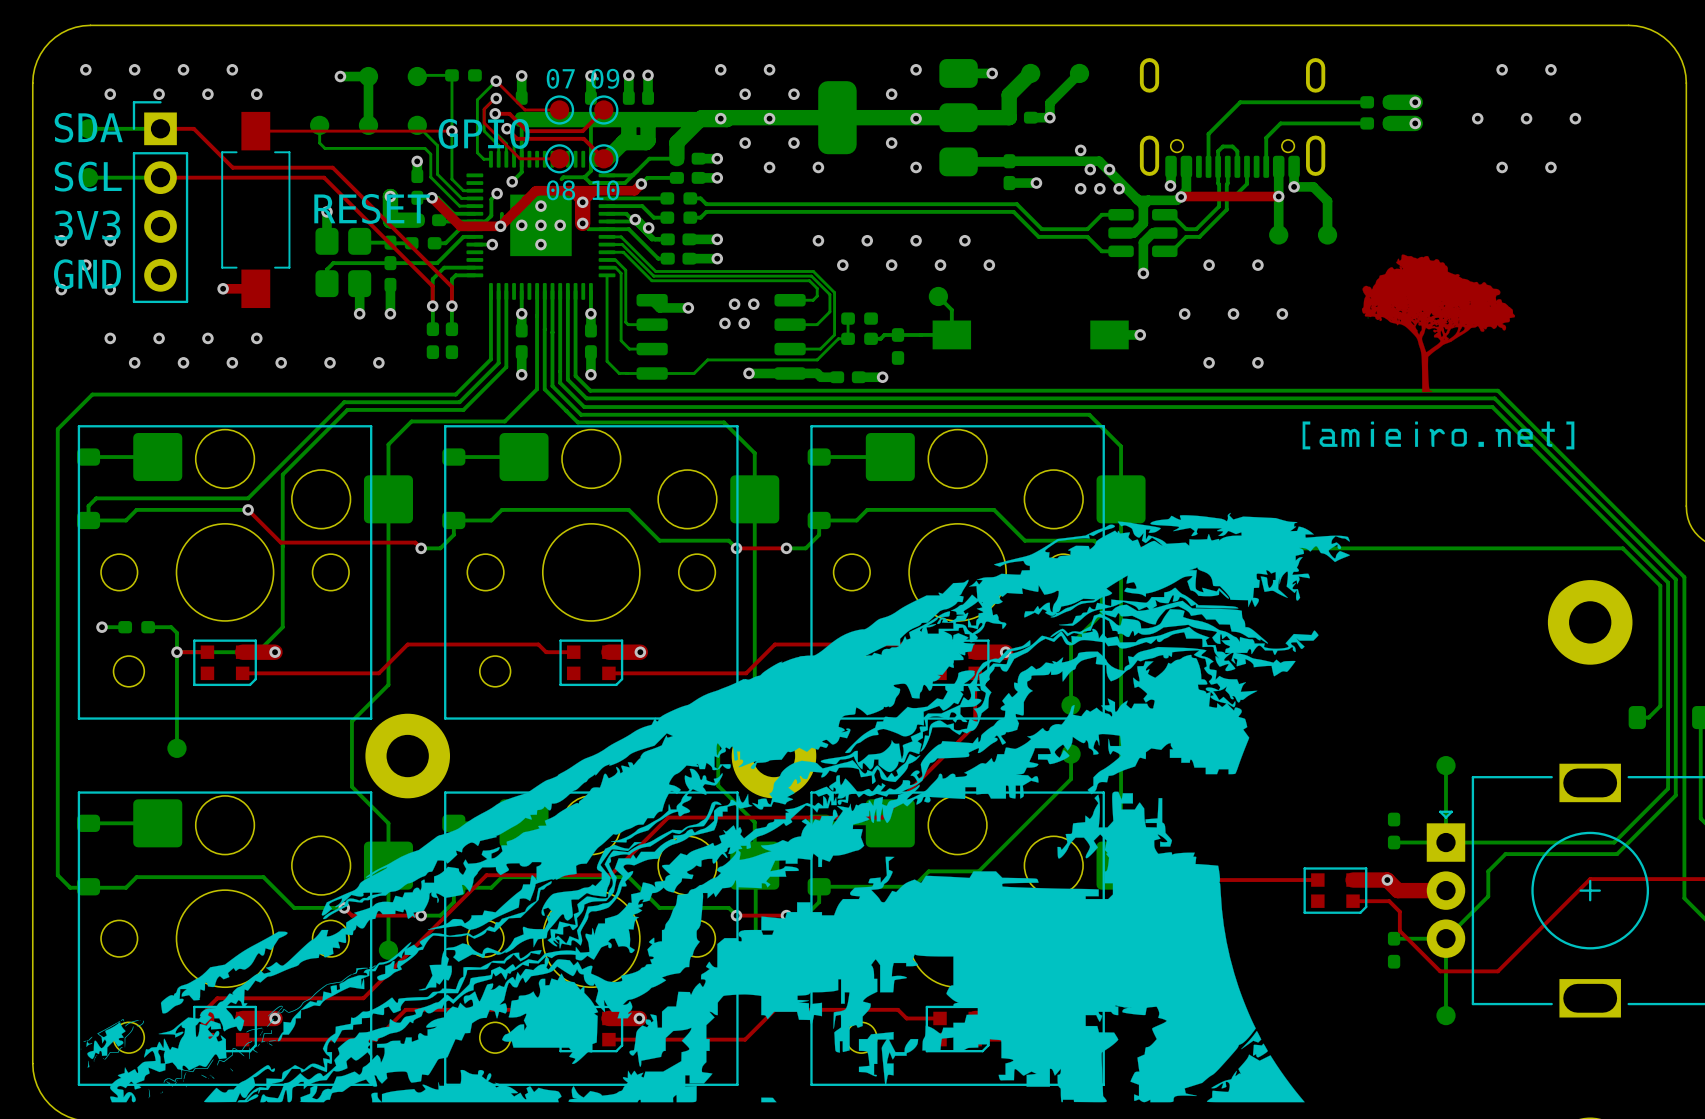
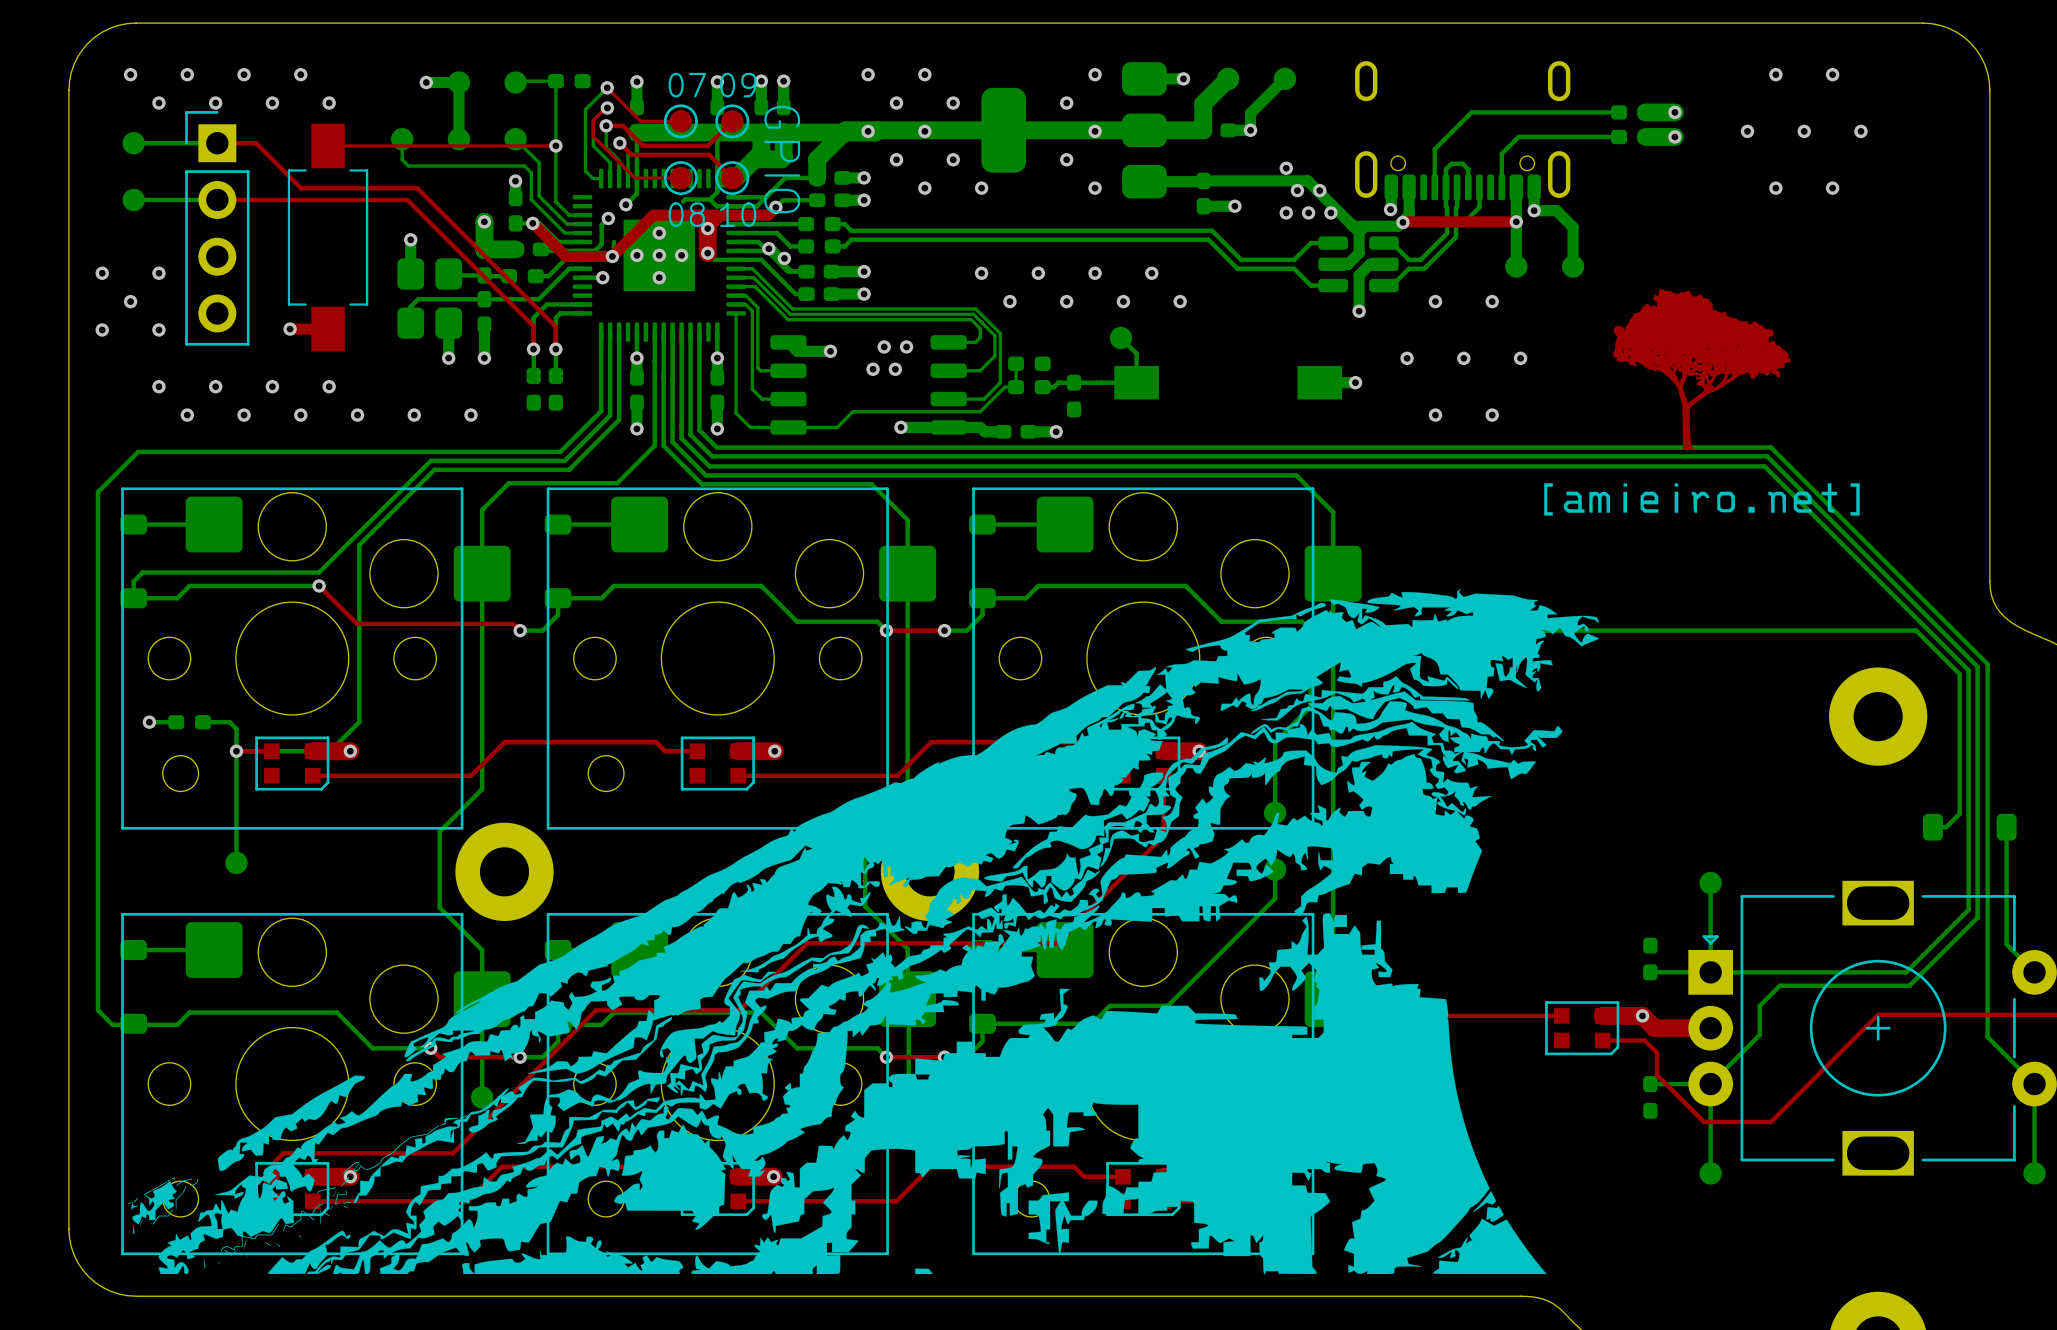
text: SDA (88, 127) -> none
text rotation: 0° (484, 133) -> 90° clockwise (782, 159)
text position: GPIO (484, 133) -> GPIO (782, 159)
text: SCL (88, 176) -> none
text: RESET (372, 208) -> none
text: 3V3 (87, 225) -> none
text: GND (87, 274) -> none

